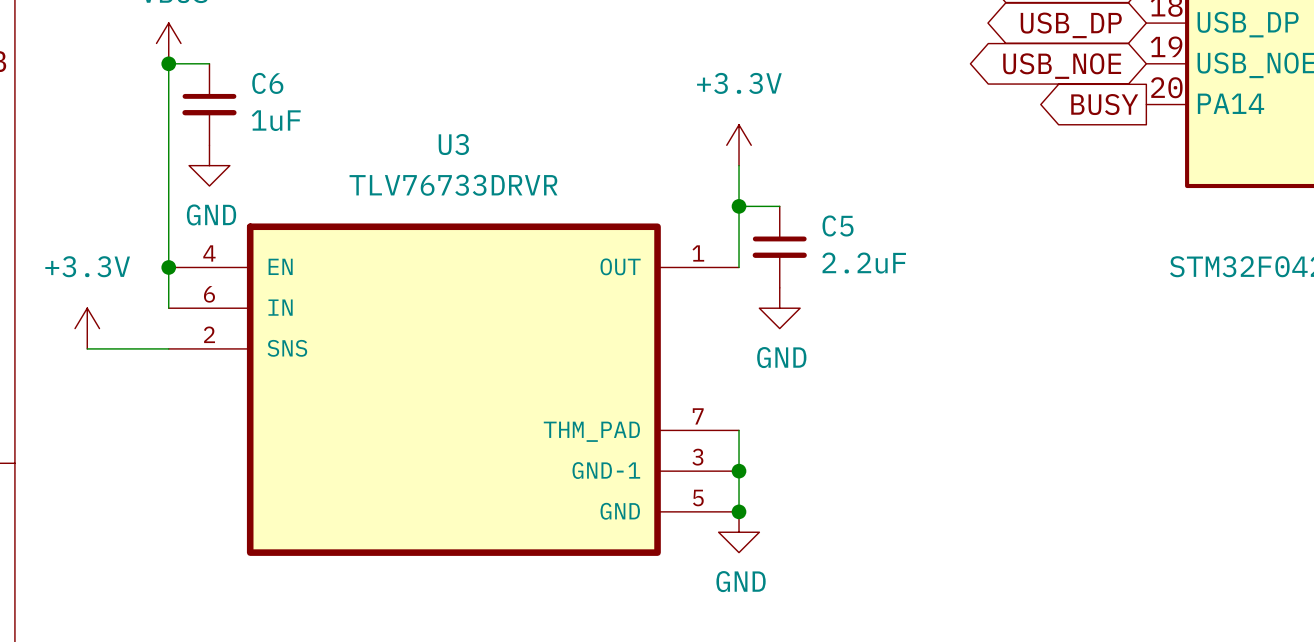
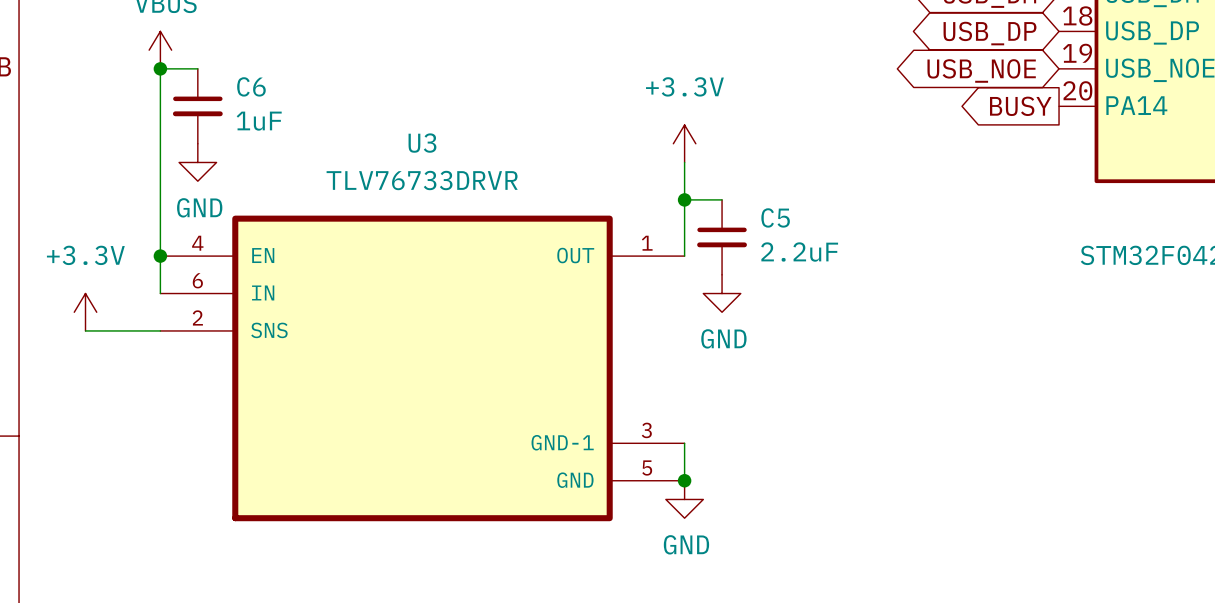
U3 symbol: [168, 223, 740, 556] -> [160, 215, 685, 522]
wire: (739, 430) (739, 471) -> none
junction: (739, 471) -> none

